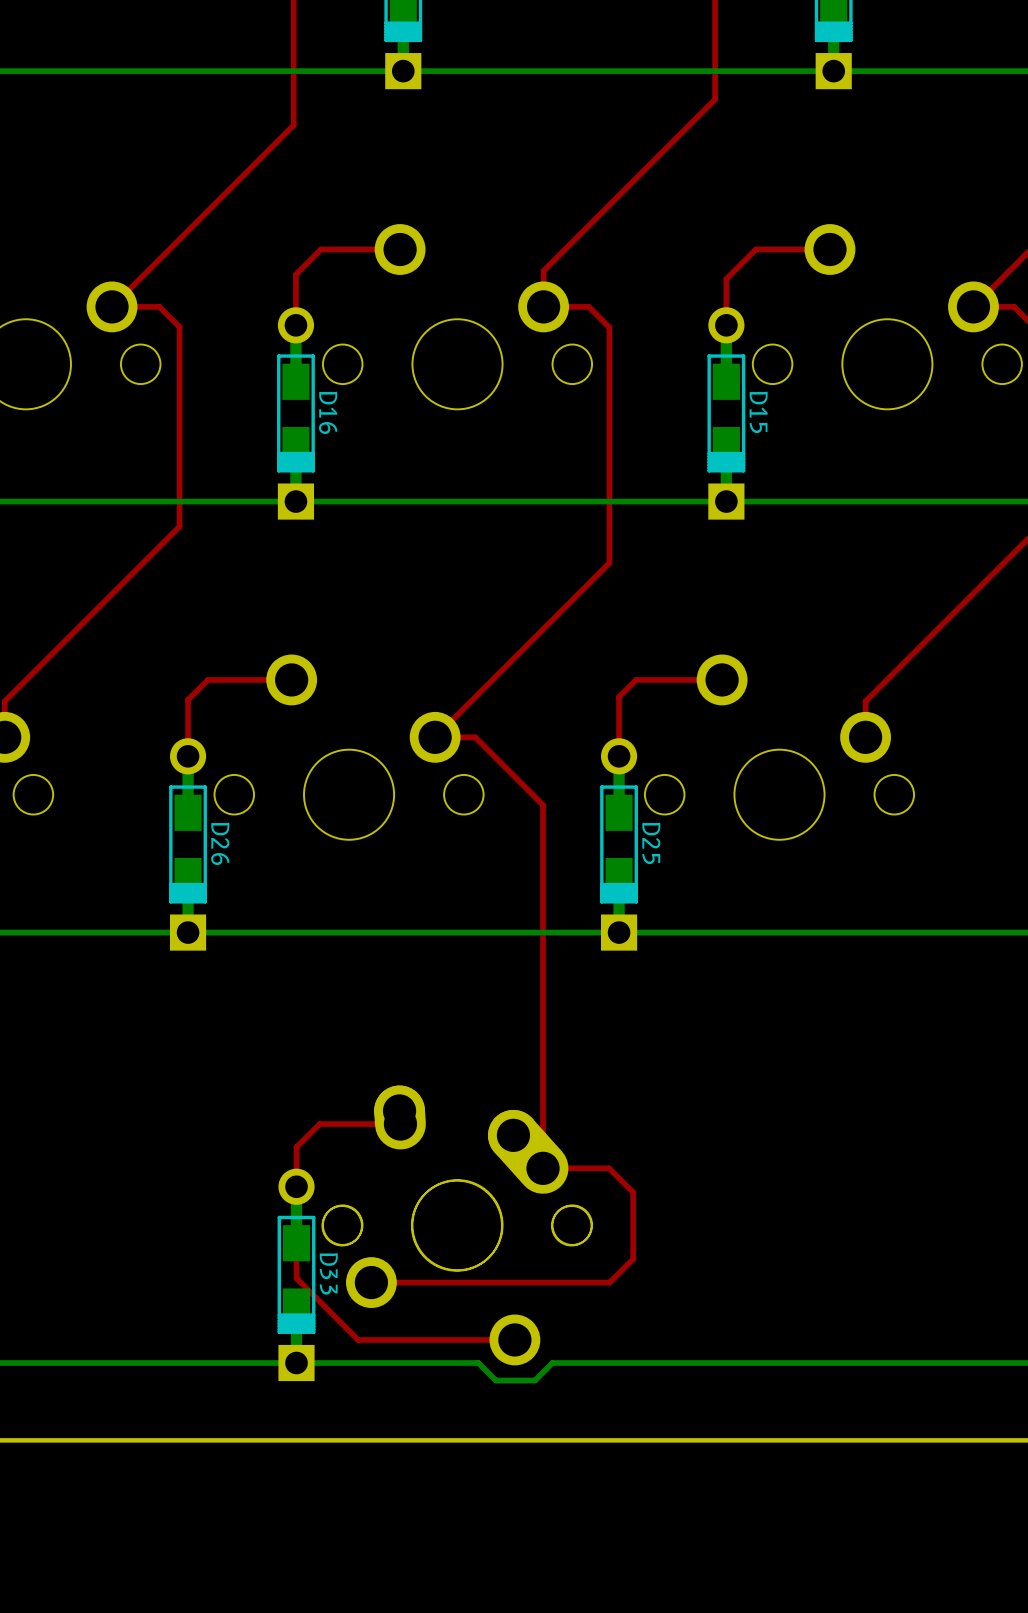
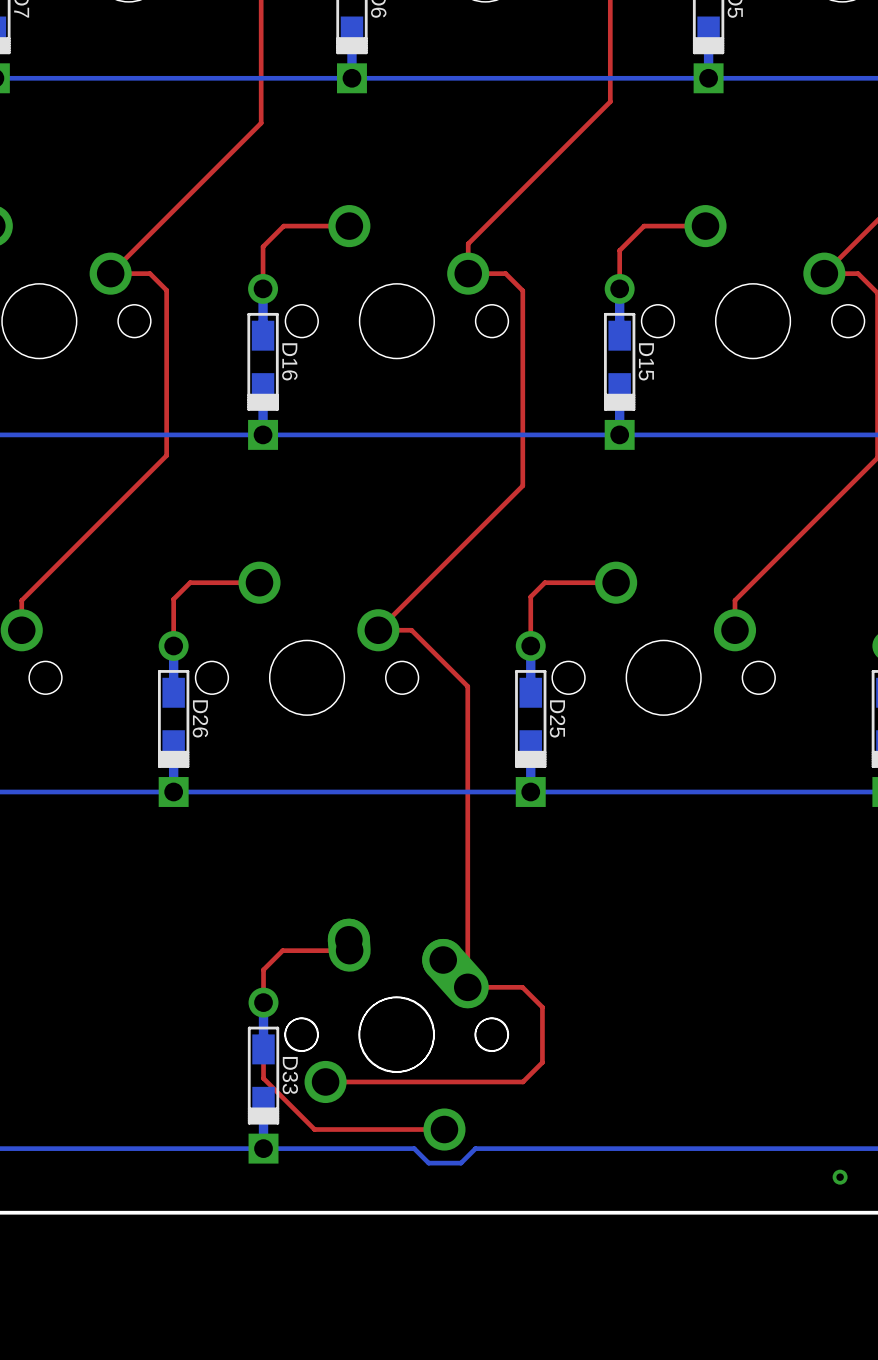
via: none -> (840, 1177)

